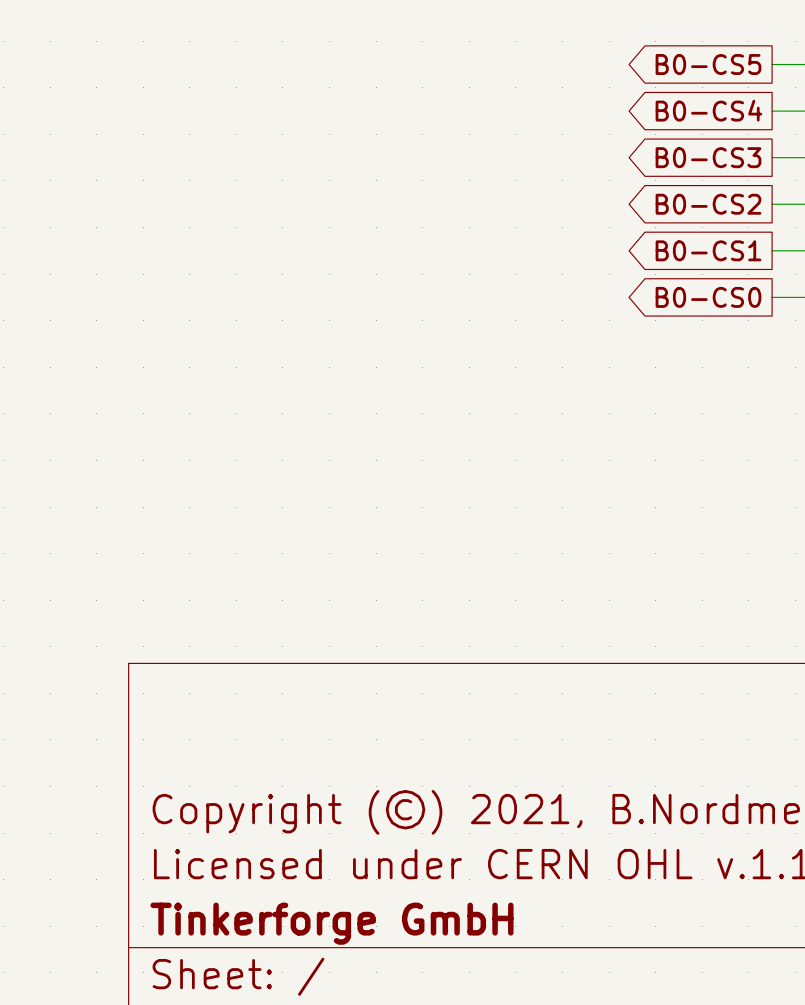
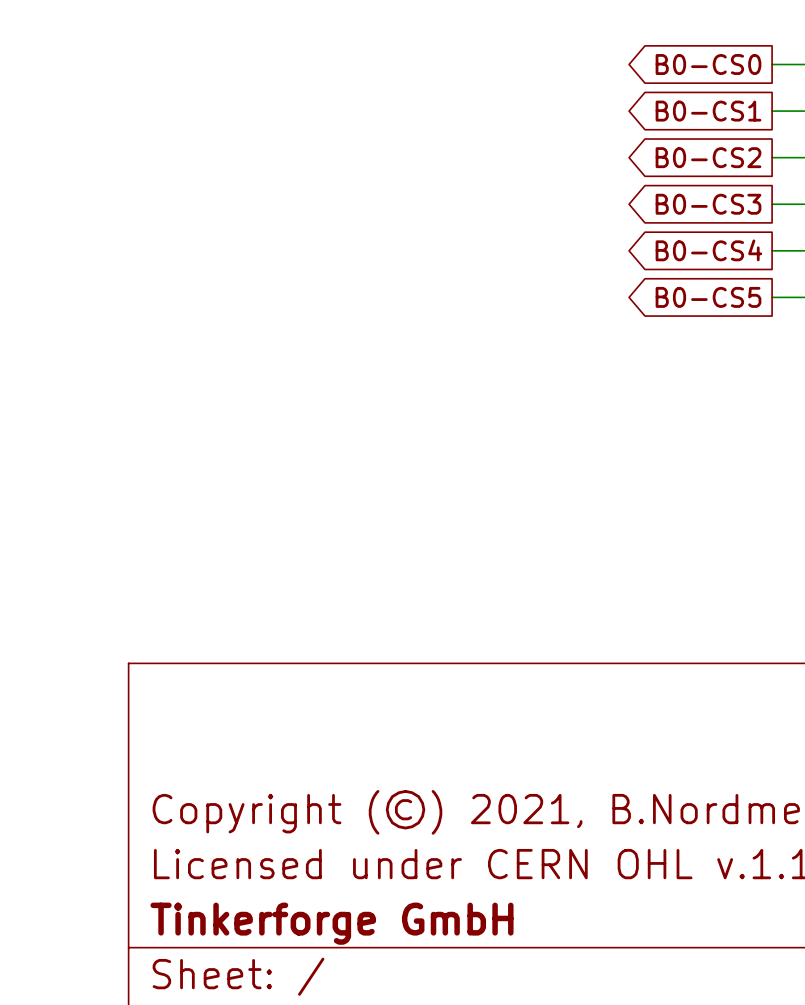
global label: B0-CS5 (708, 64) -> B0-CS0 (708, 64)
global label: B0-CS4 (708, 110) -> B0-CS1 (708, 111)
global label: B0-CS3 (708, 157) -> B0-CS2 (708, 157)
global label: B0-CS2 (708, 204) -> B0-CS3 (708, 204)
global label: B0-CS1 (708, 250) -> B0-CS4 (708, 250)
global label: B0-CS0 (708, 297) -> B0-CS5 (708, 297)

